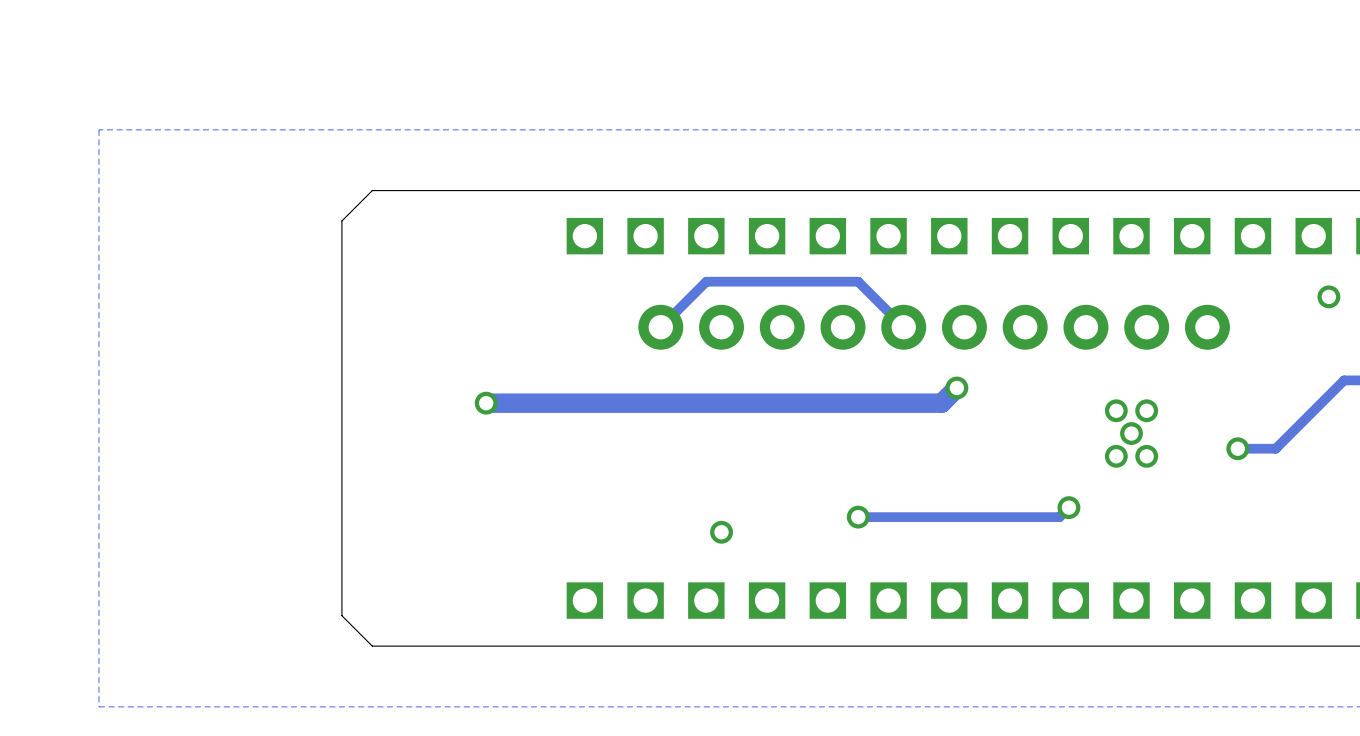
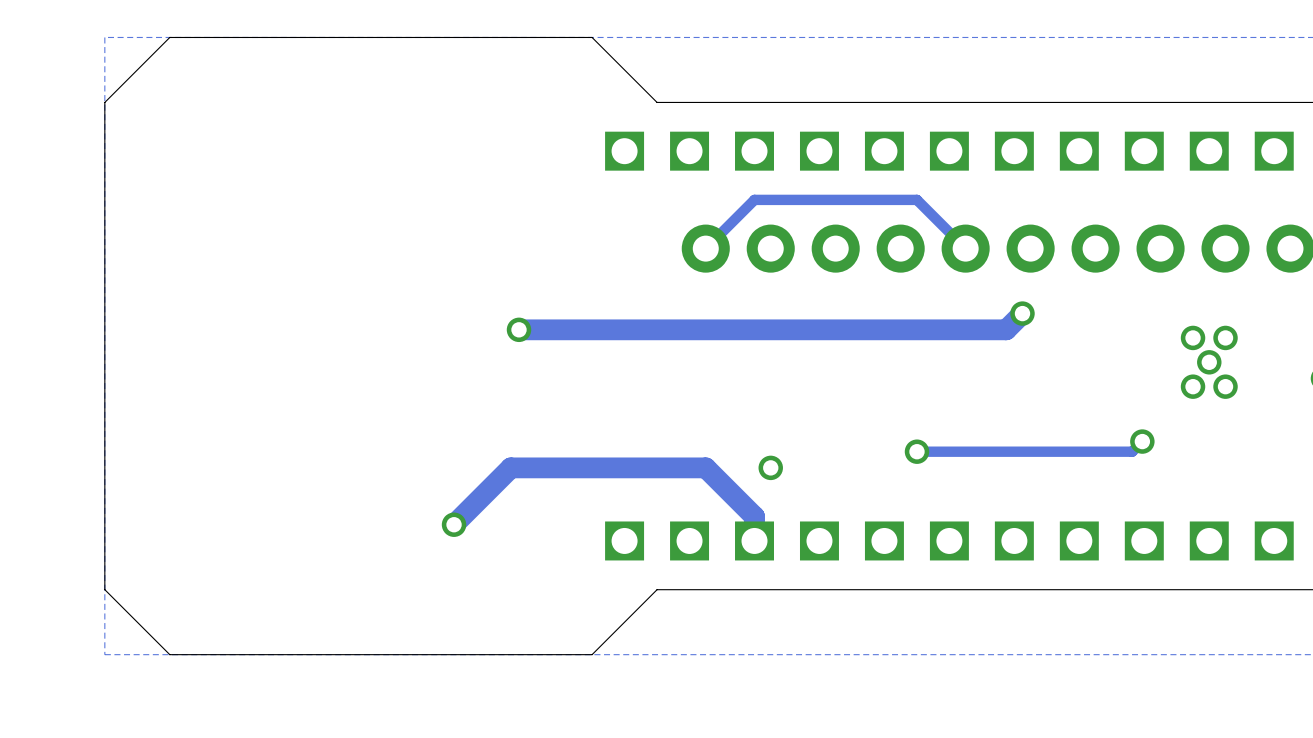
board edge: (615, 190) (372, 190) (341, 220) (341, 615) (372, 646) (615, 646) -> (657, 102) (592, 37) (169, 37) (104, 102) (104, 589) (169, 654) (592, 654) (657, 589)
track: none -> (454, 524) (510, 467) (705, 467) (754, 516) (754, 540)
via: none -> (454, 524)

